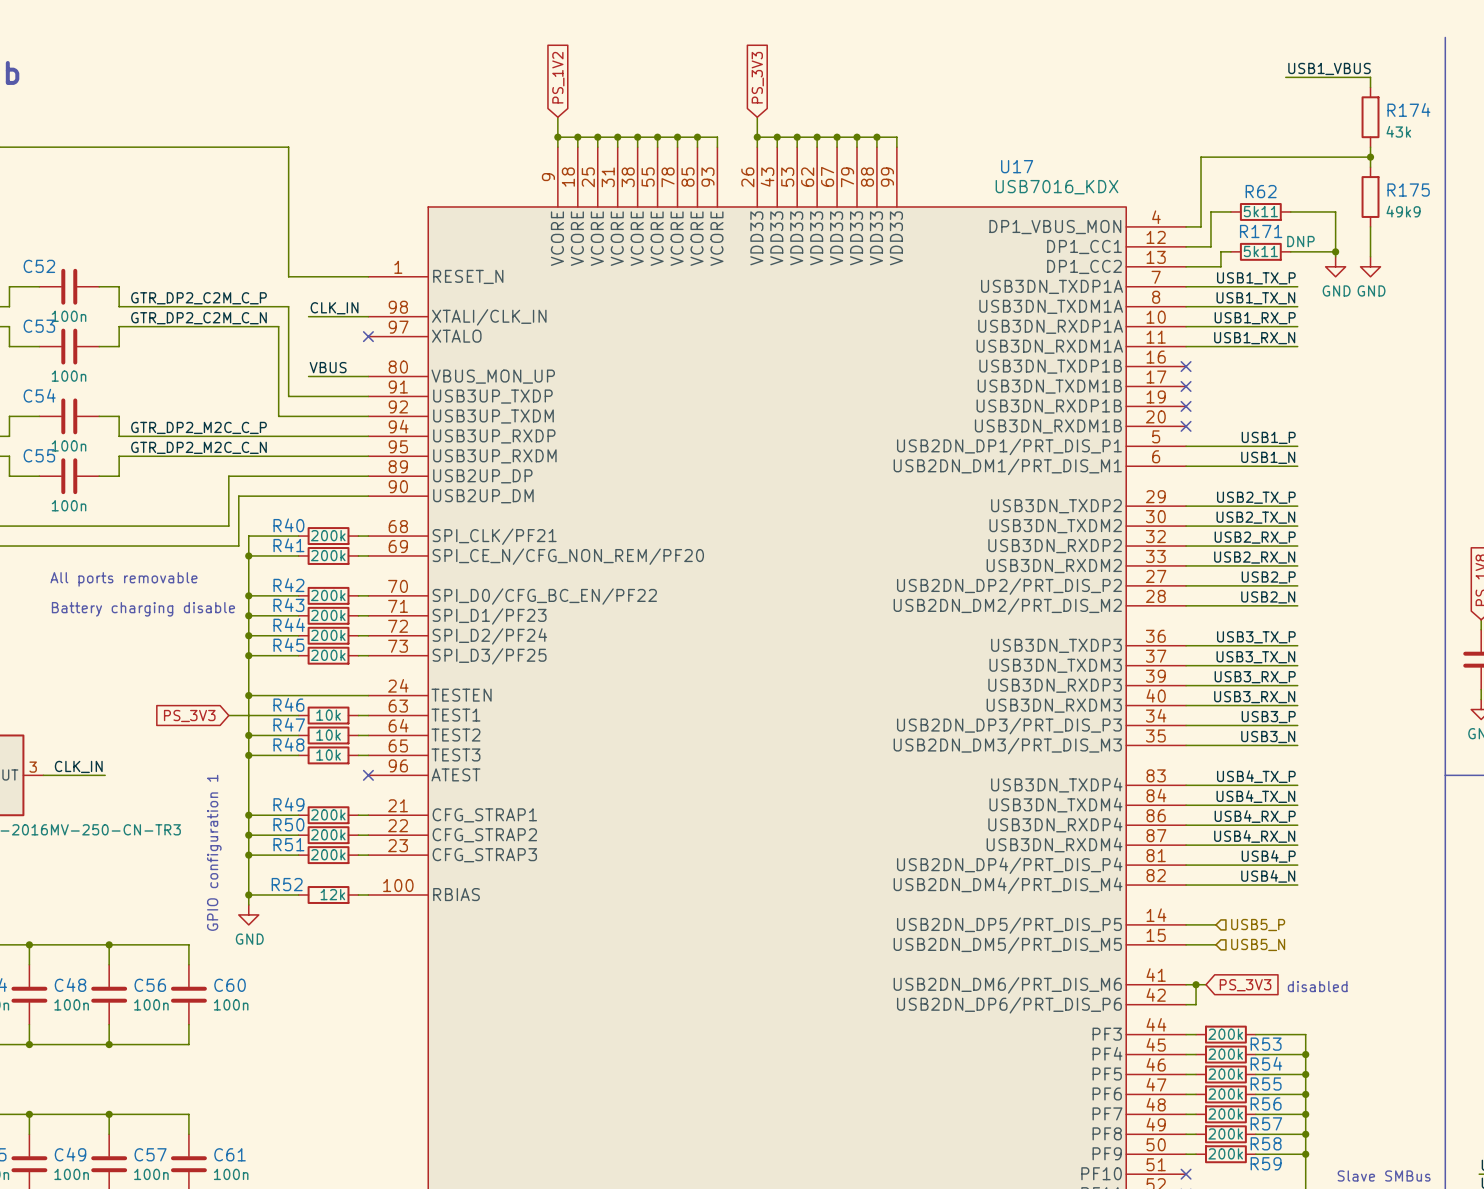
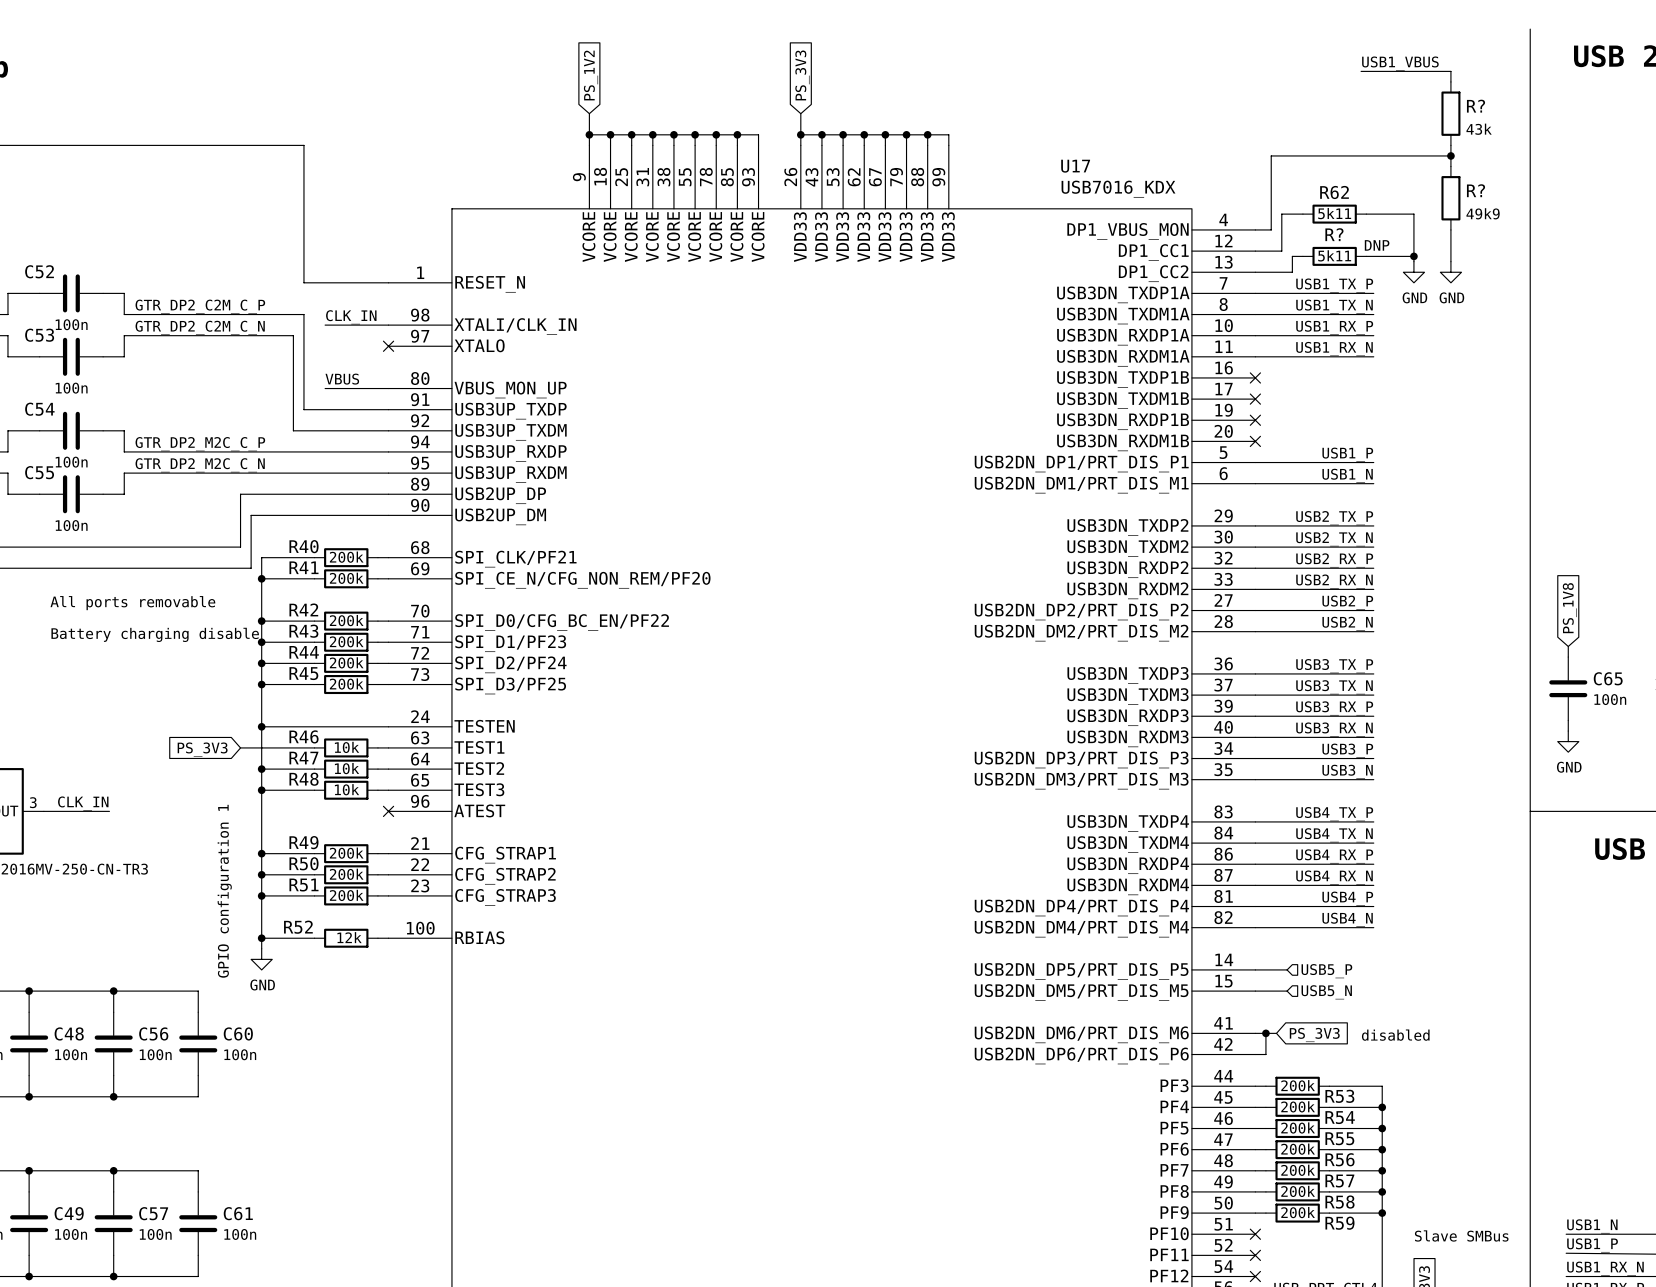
R174 name: R174 (1408, 109) -> R? (1476, 106)
R175 name: R175 (1408, 190) -> R? (1476, 190)
R171 name: R171 (1261, 231) -> R? (1334, 234)

